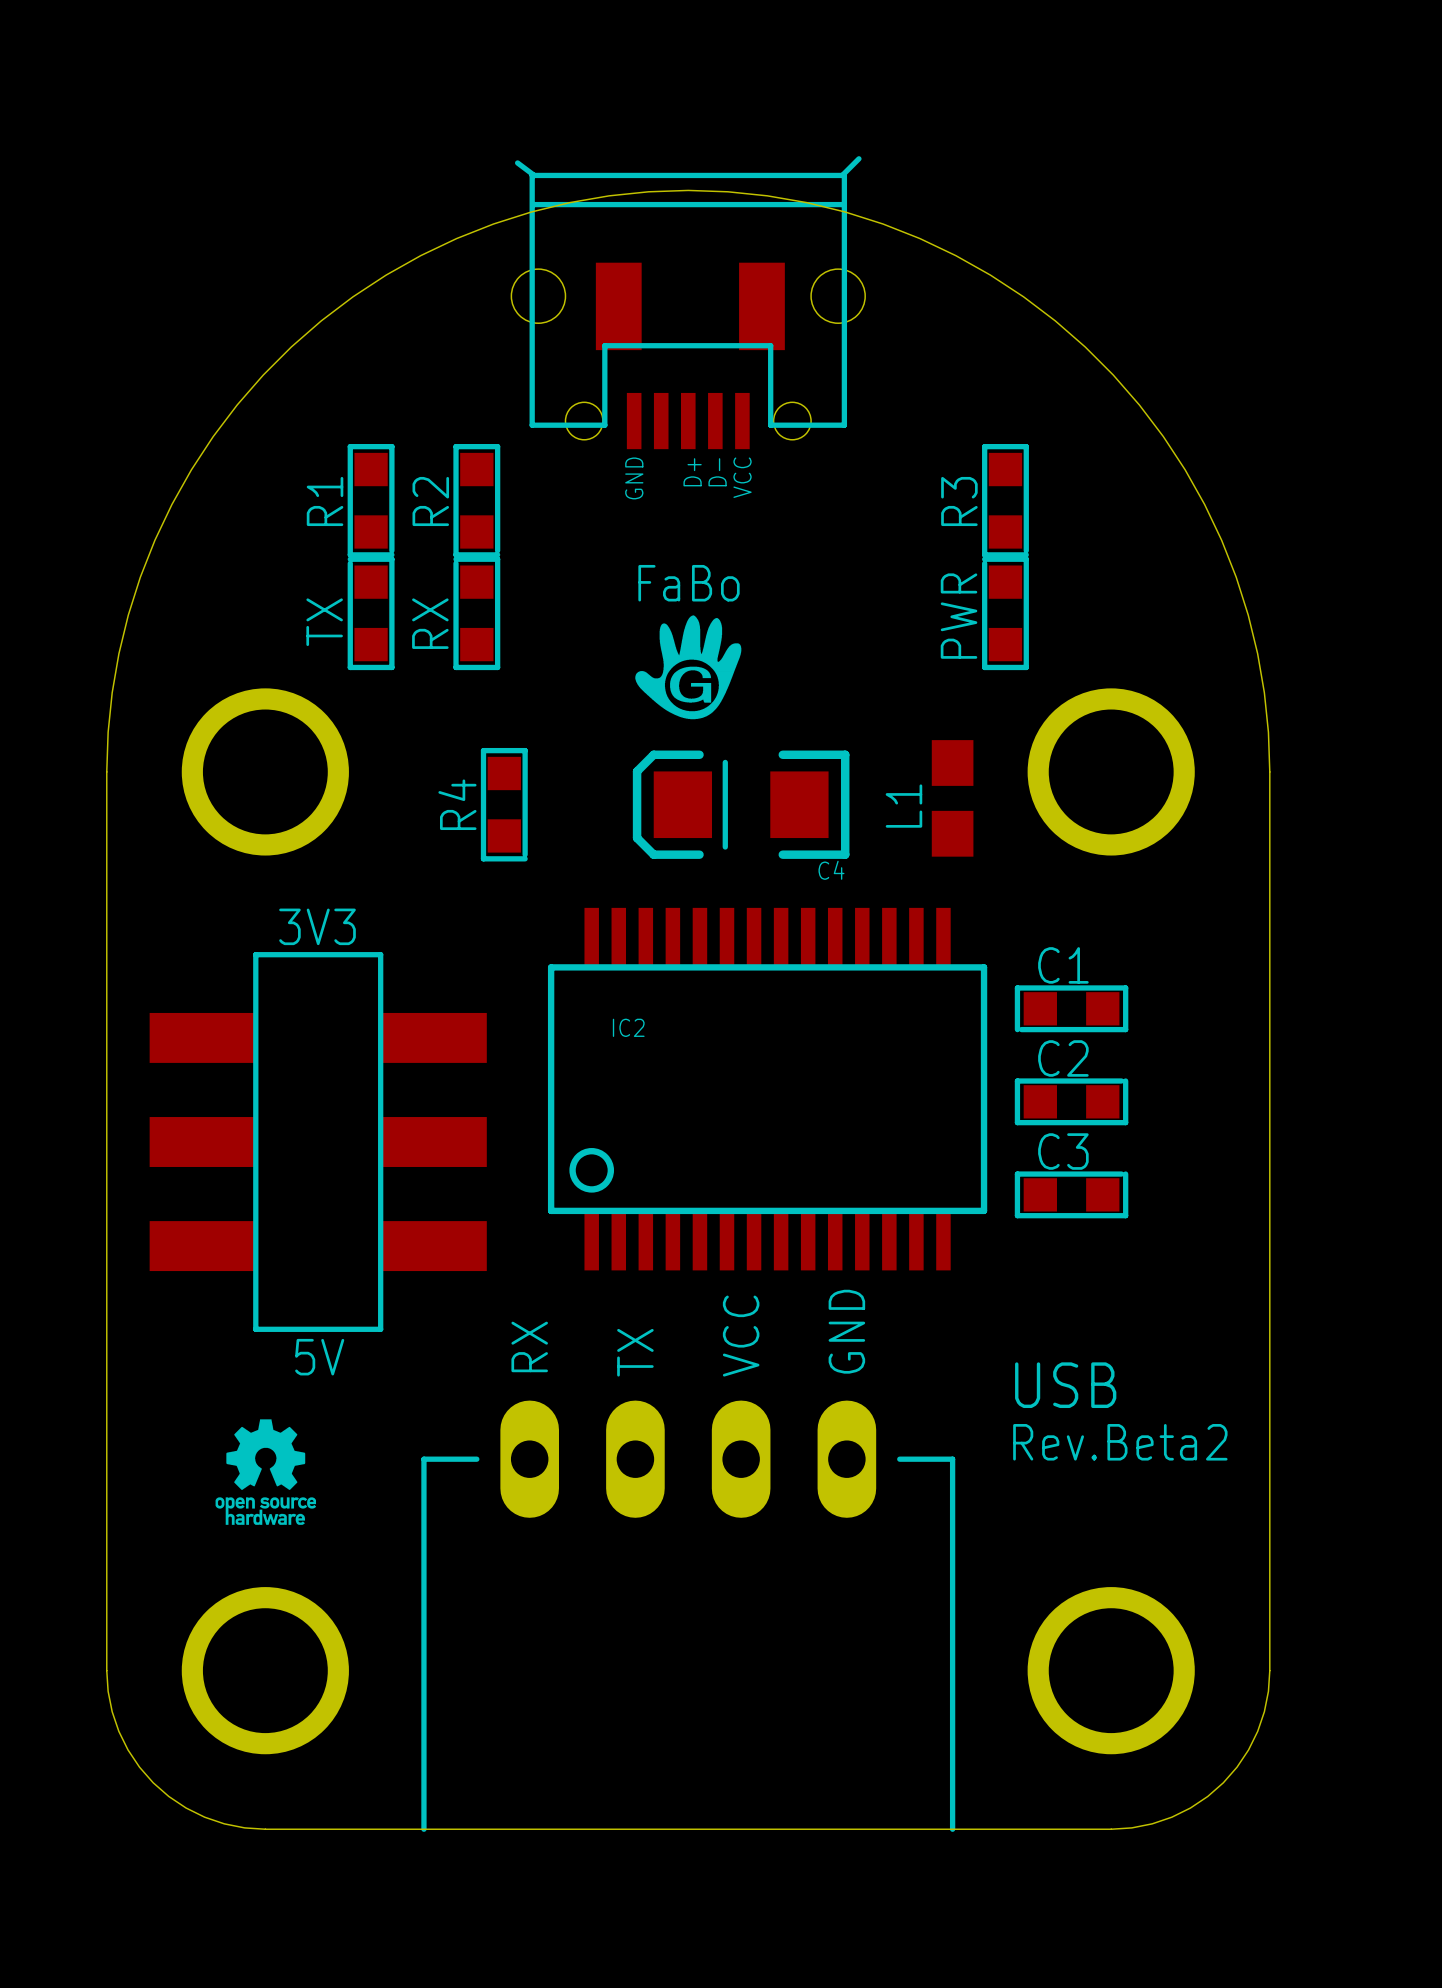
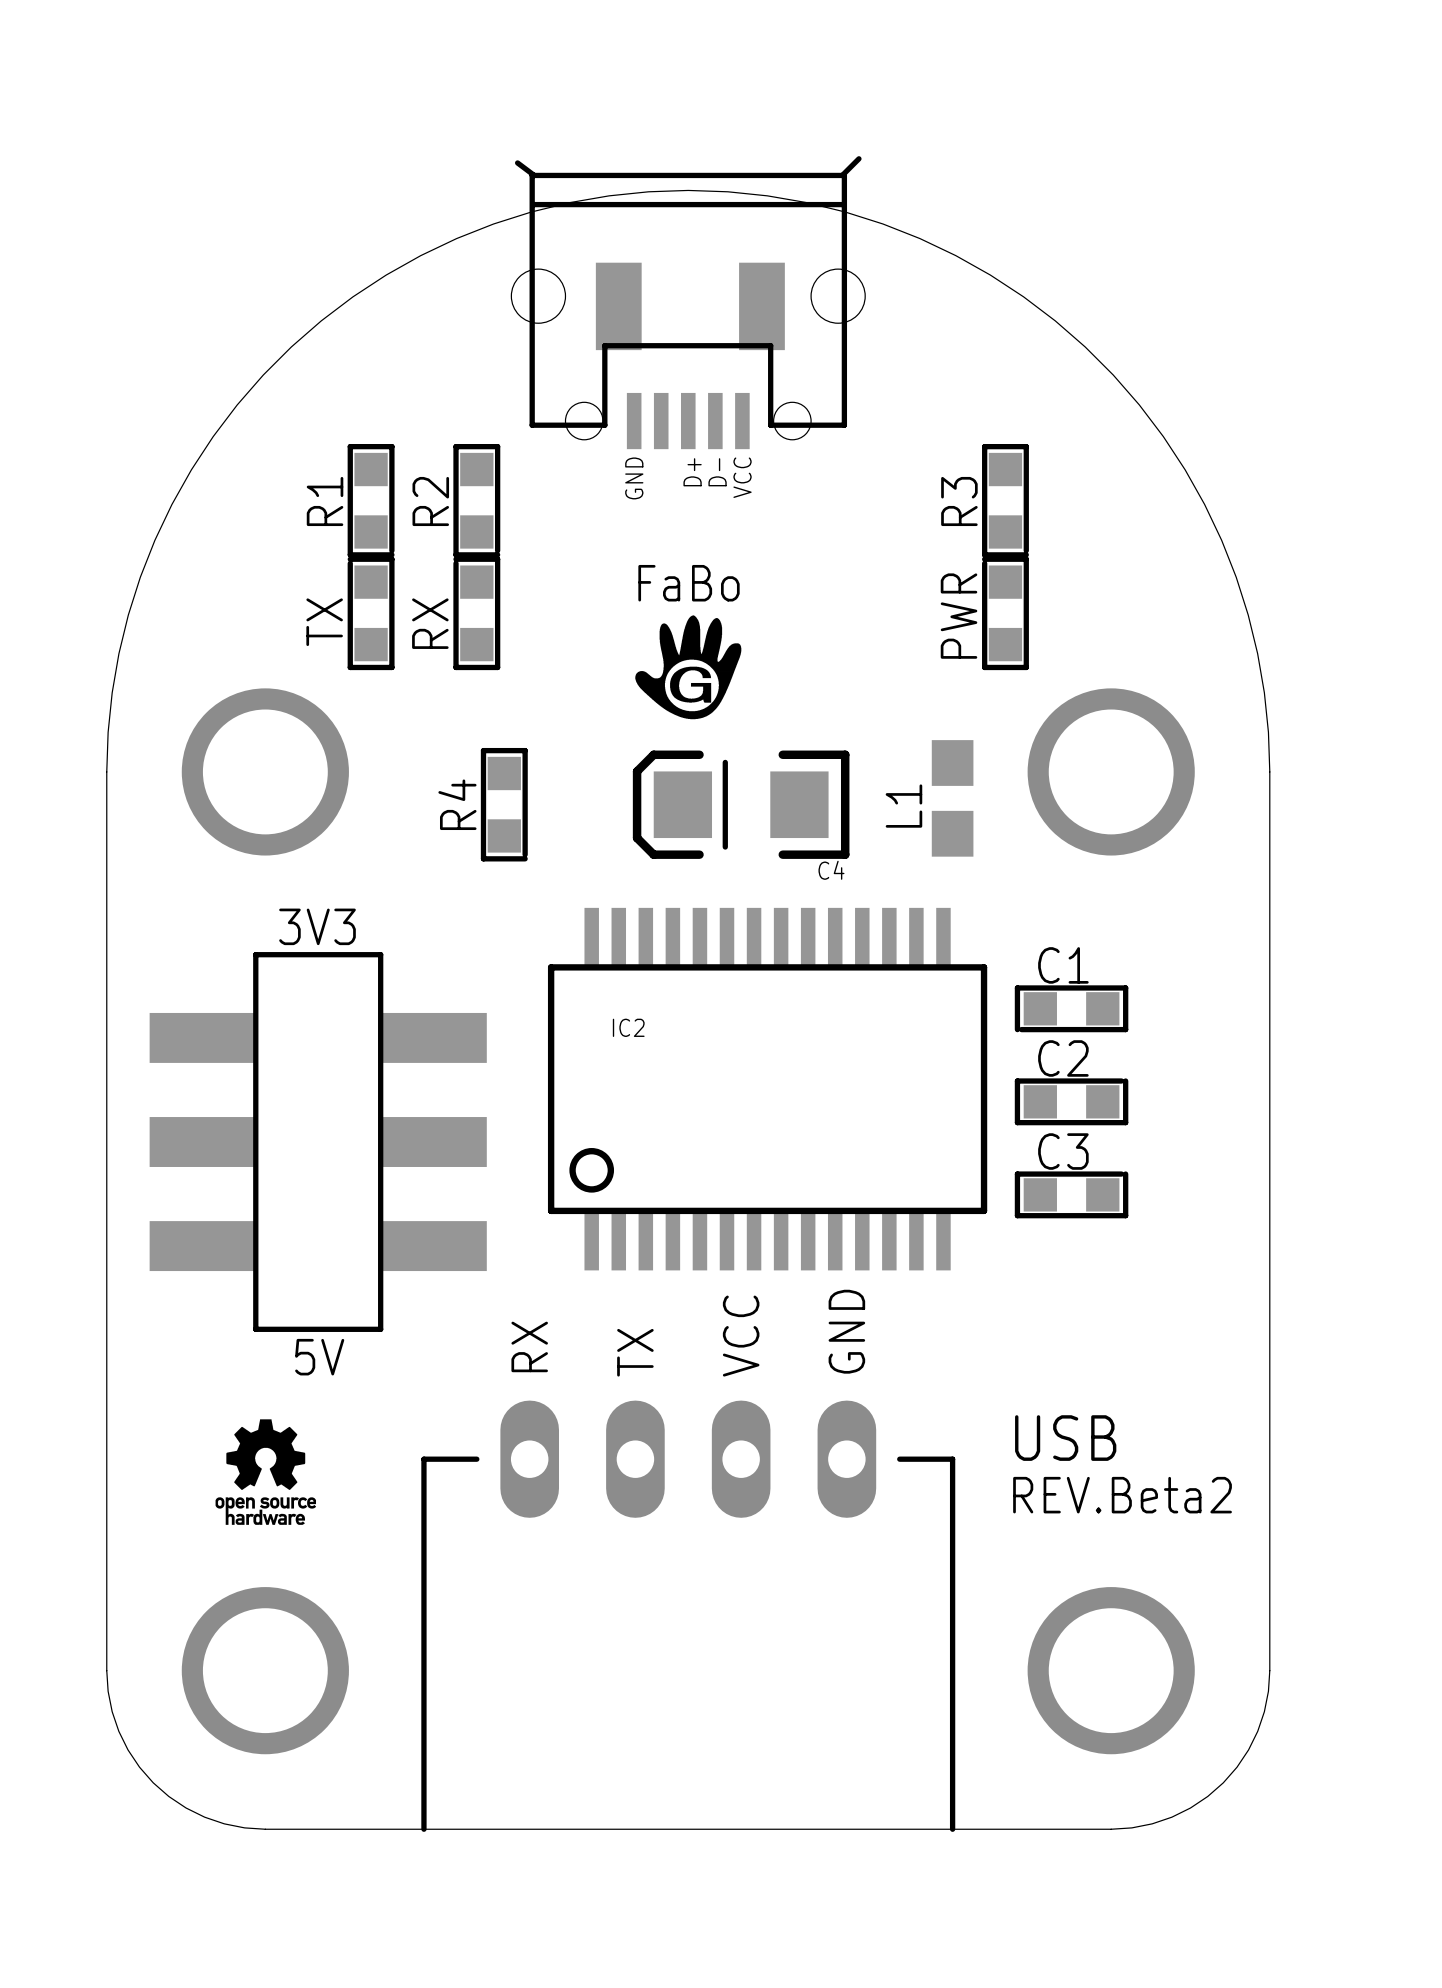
text: USB (1065, 1385) -> none
text: Rev.Beta2 (1120, 1442) -> USB (1065, 1438)
text: none -> REV.Beta2 (1122, 1495)

